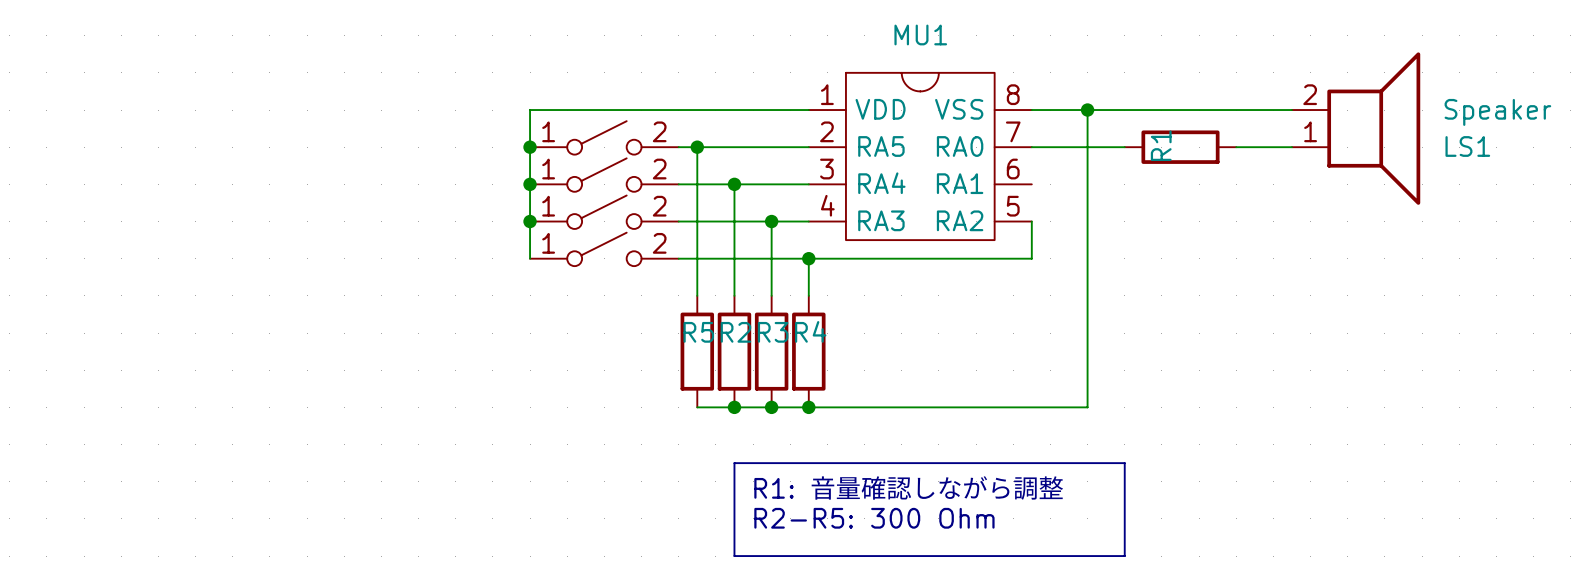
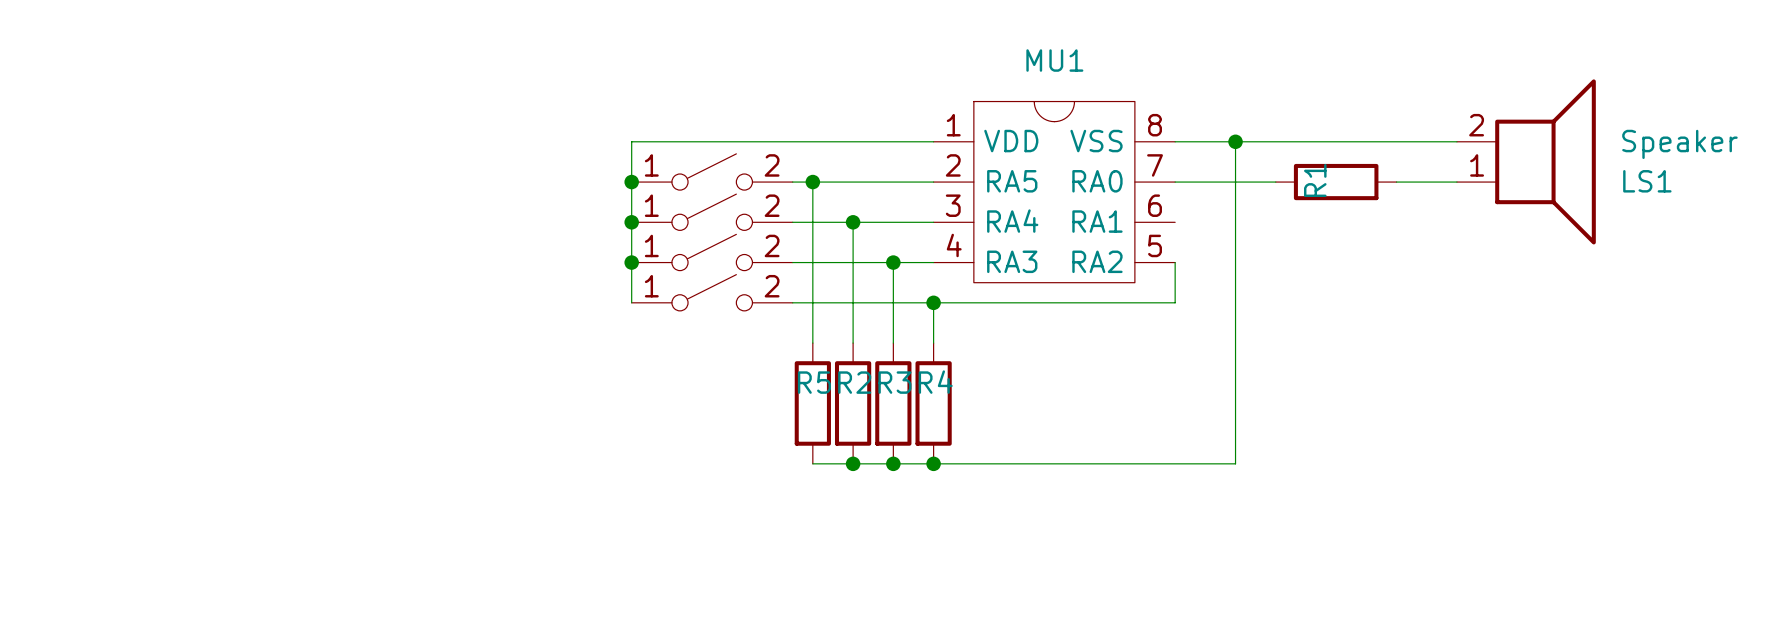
line: (734, 463) (1124, 463) (1124, 556) (734, 556) (734, 463) -> none
text: R1: 音量確認しながら調整 (909, 488) -> none
text: R2-R5: 300 Ohm (874, 518) -> none

